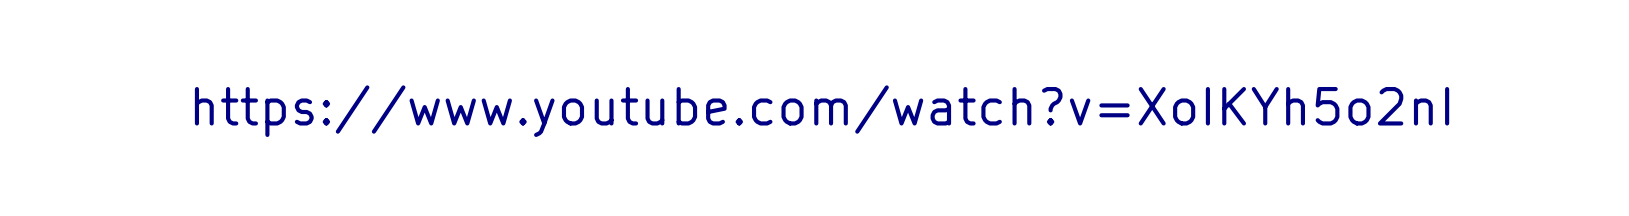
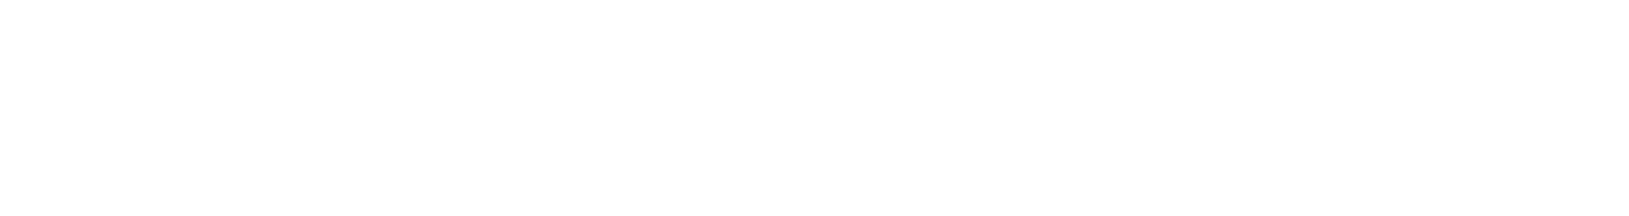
text: https://www.youtube.com/watch?v=XoIKYh5o2nI (822, 111) -> none

